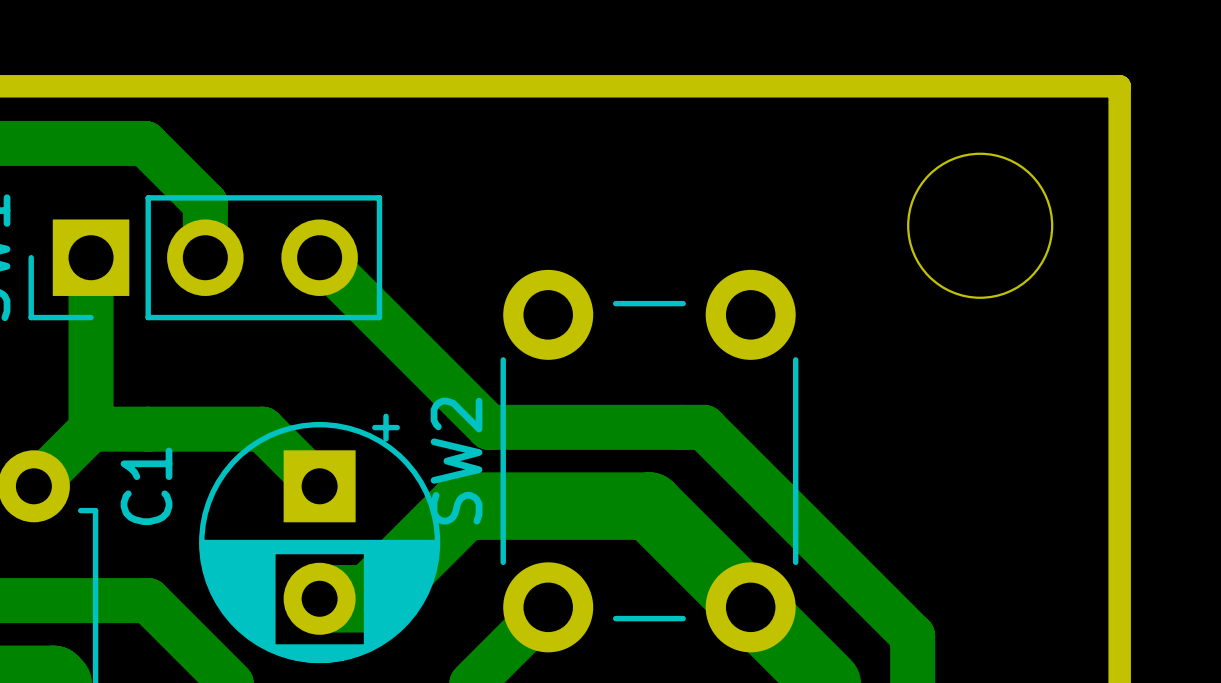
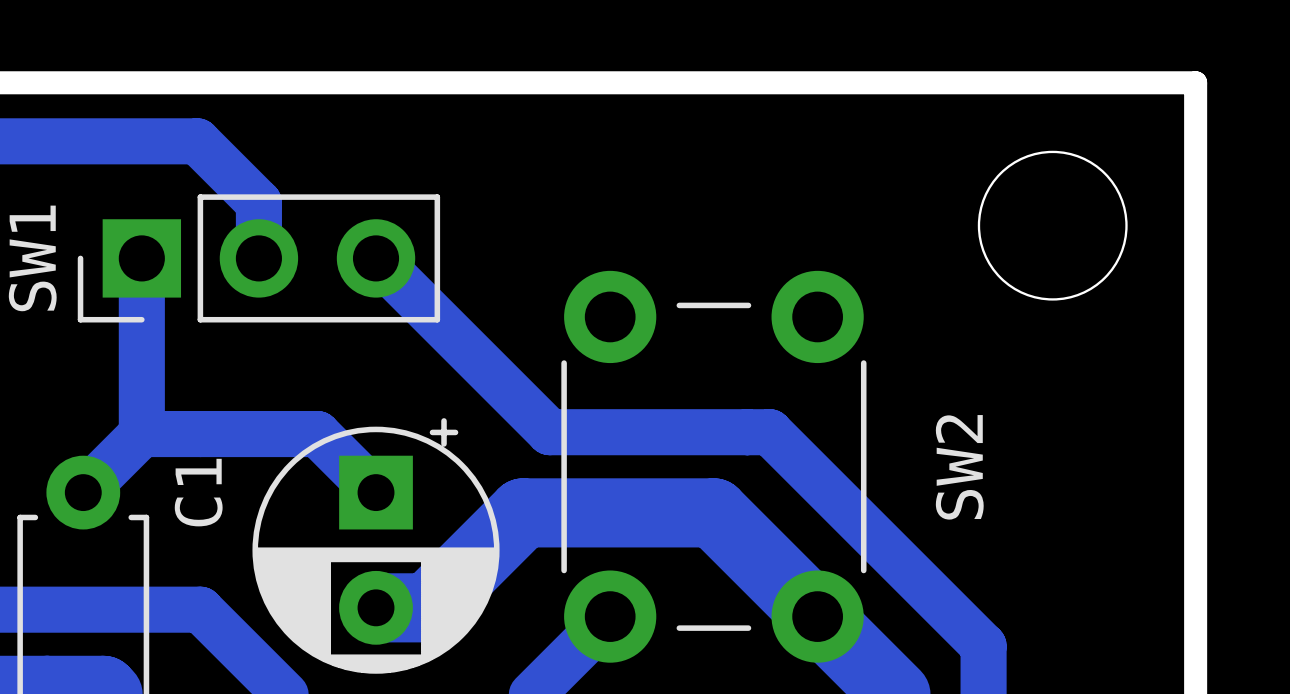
SW2 name position: SW2 (456, 461) -> SW2 (959, 467)

